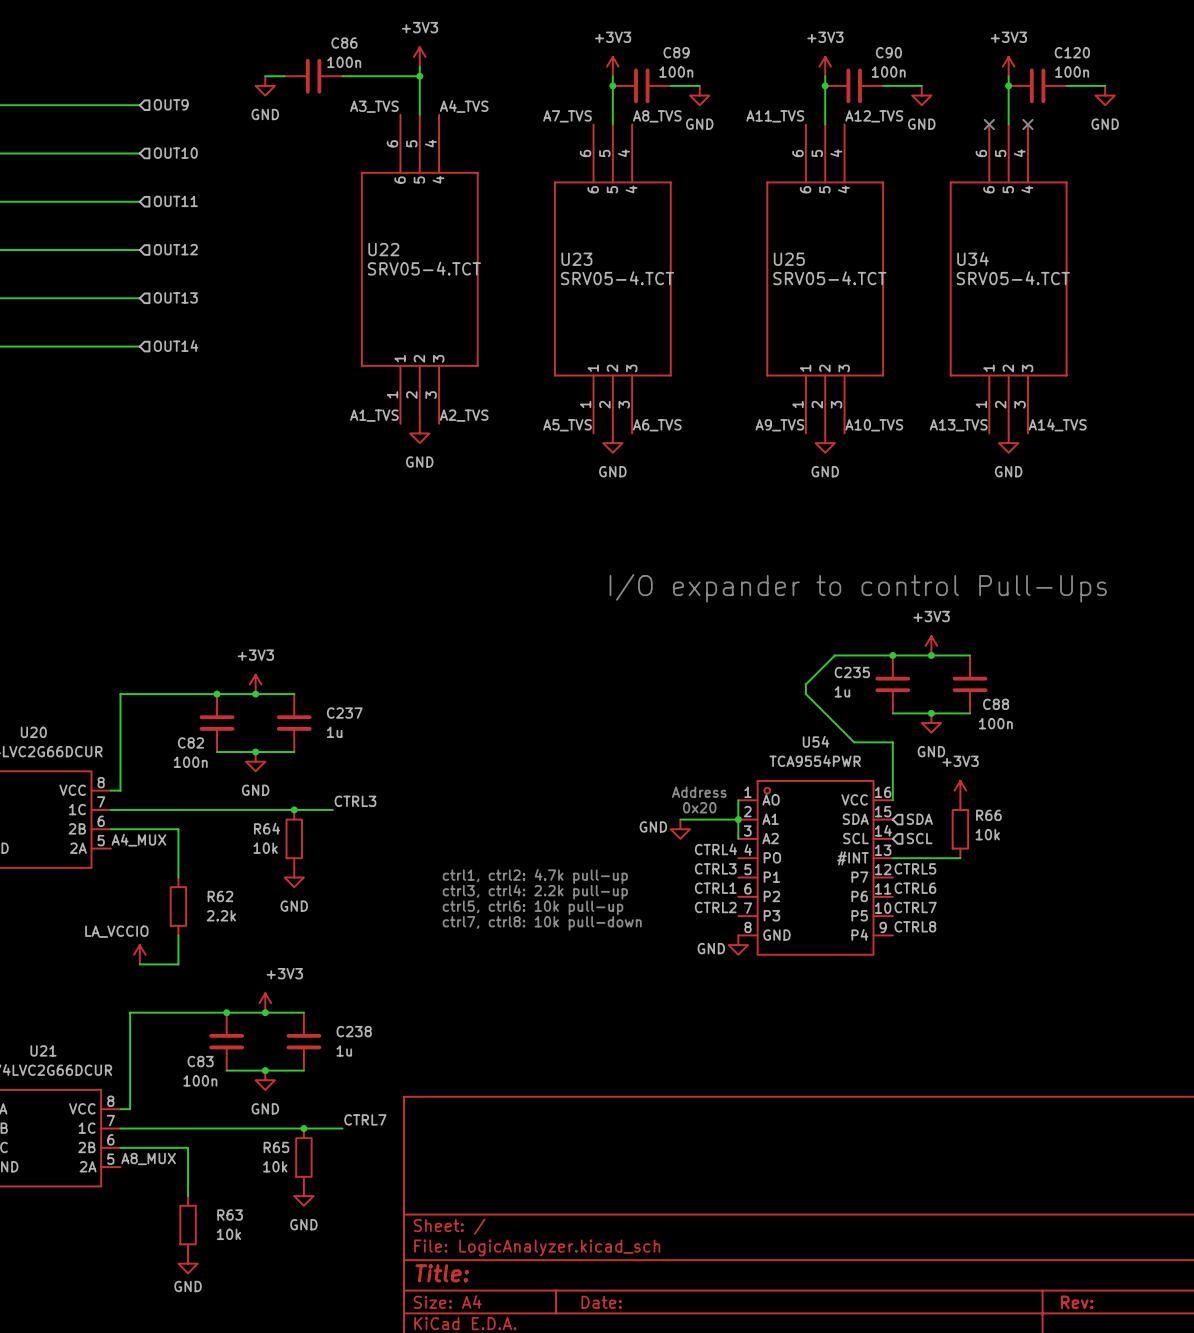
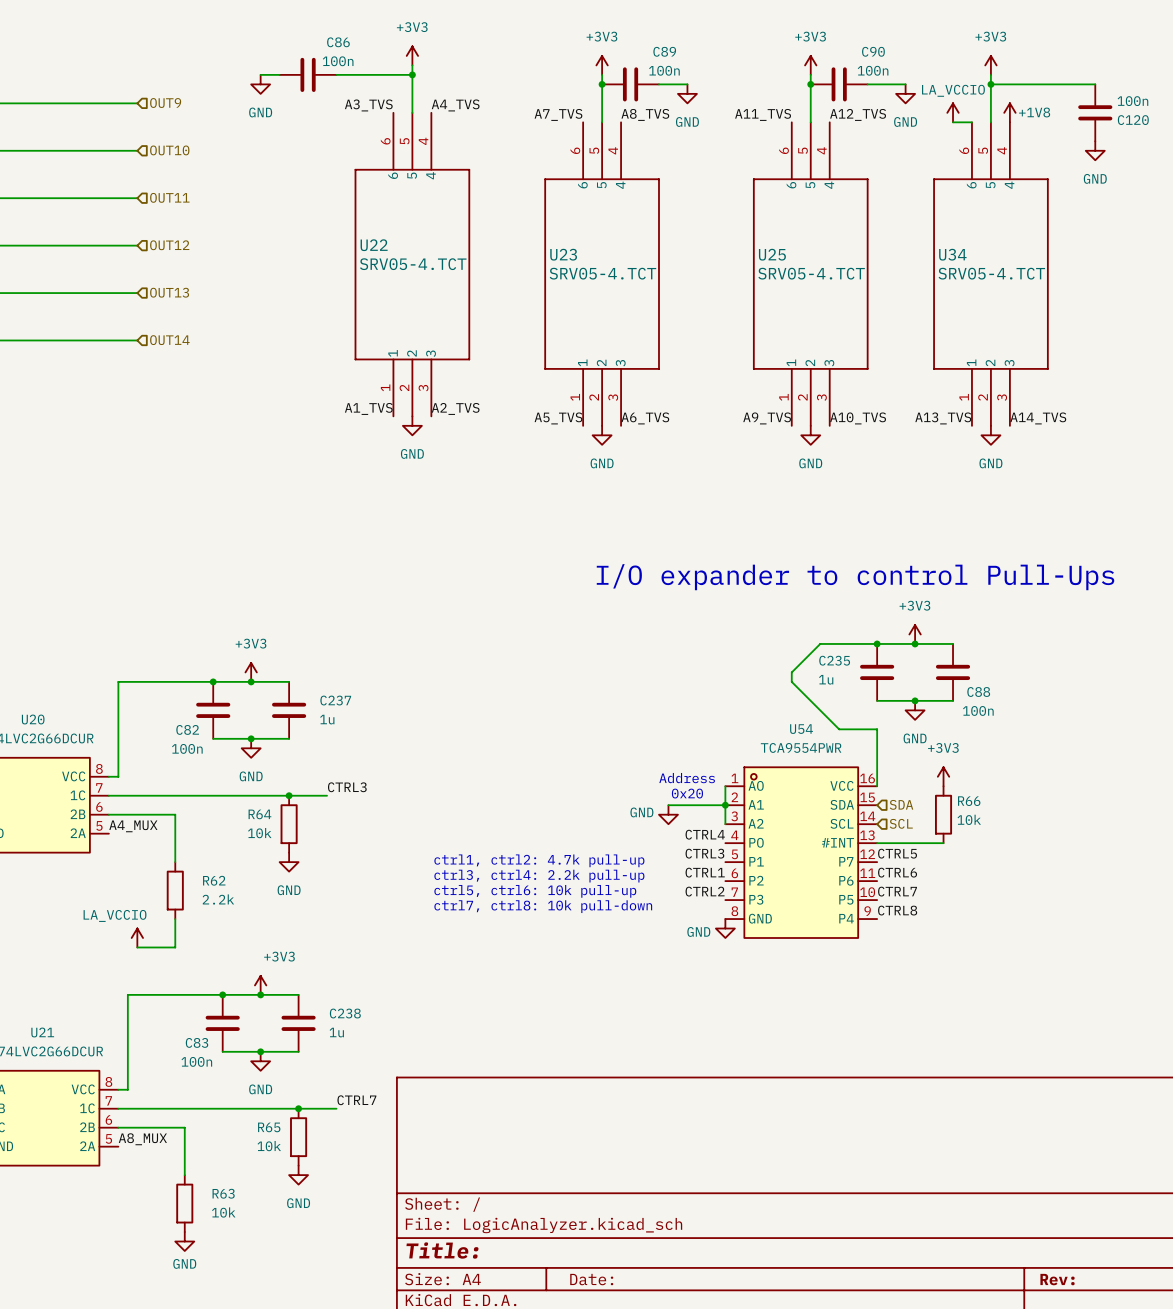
C120 name position: C120 (1072, 52) -> C120 (1133, 120)
C120 rotation: 0° (1037, 85) -> 90° clockwise (1095, 112)
C120 position: (1037, 85) -> (1095, 112)
wire: none -> (1085, 84) (1095, 84)
power symbol position: GND (1105, 95) -> GND (1095, 150)
power symbol: none -> LA_VCCIO (953, 112)
power symbol: none -> +1V8 (1009, 112)
wire: none -> (953, 122) (971, 122)
no-connect mark: (989, 124) -> none
no-connect mark: (1027, 124) -> none

